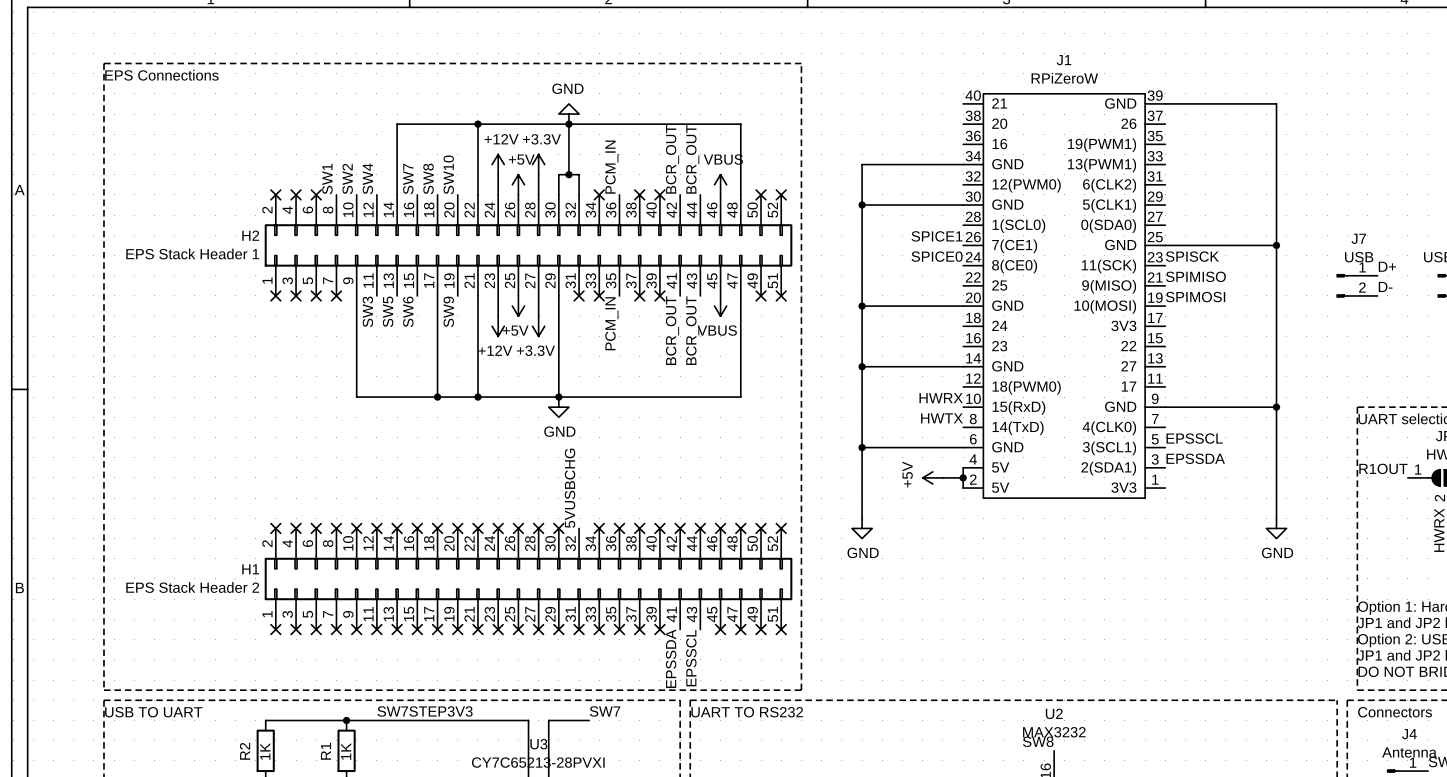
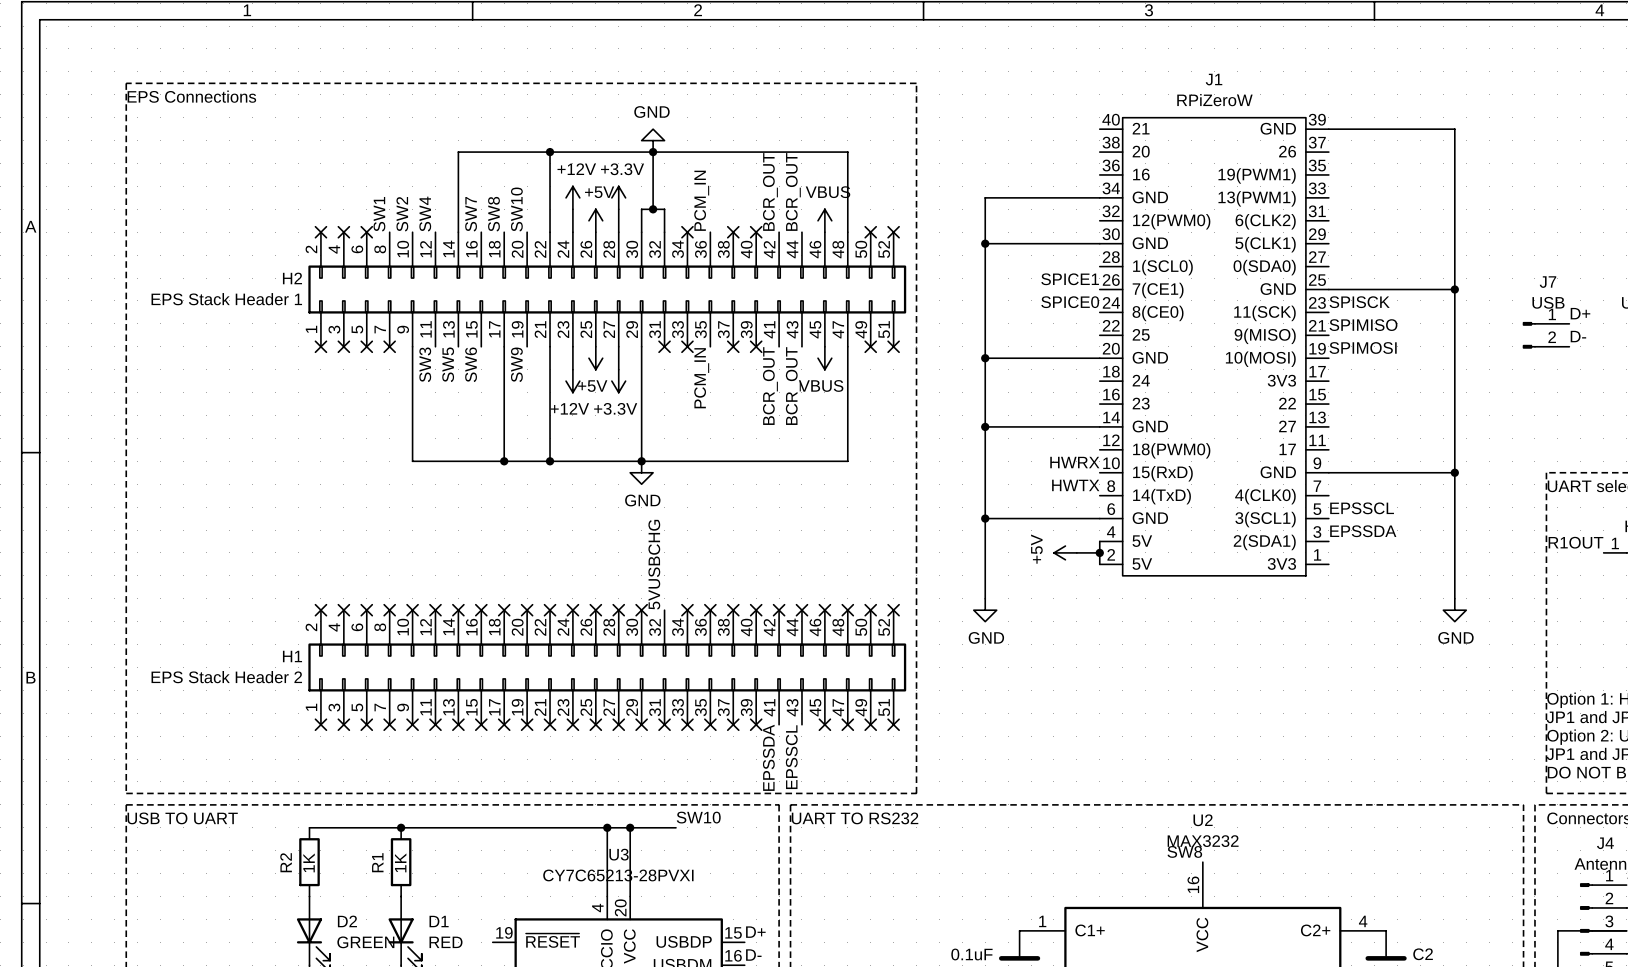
label: SW7STEP3V3 (425, 711) -> none
label: SW7 (605, 711) -> SW10 (698, 817)
wire: none -> (607, 827) (630, 827)
junction: none -> (607, 827)
junction: none -> (630, 827)

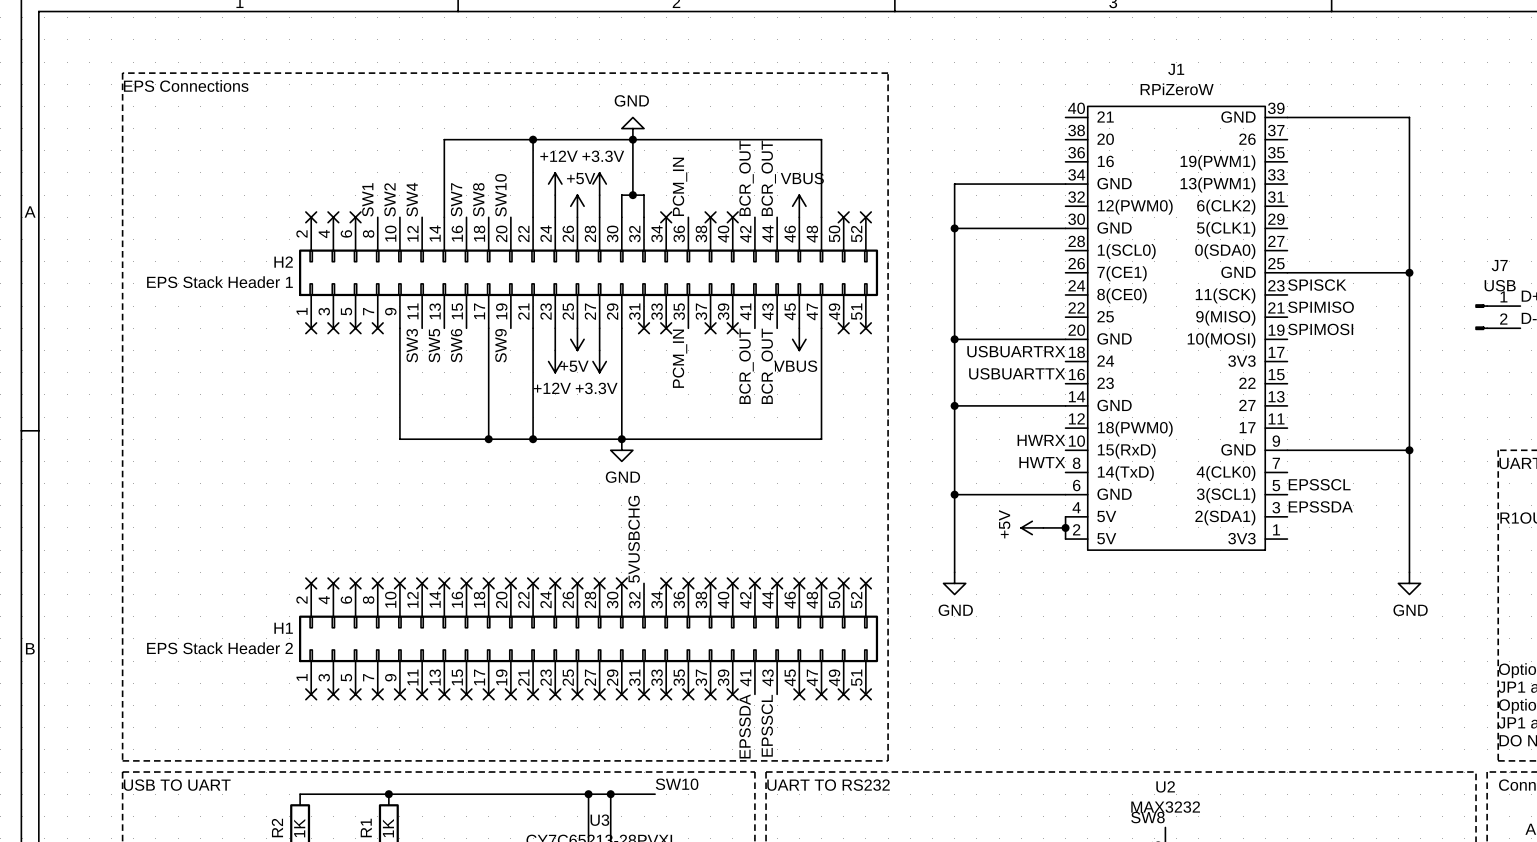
label: SPICE1 (1070, 279) -> none
label: SPICE0 (1070, 302) -> none
label: none -> USBUARTRX (1016, 351)
label: none -> USBUARTTX (1017, 373)

